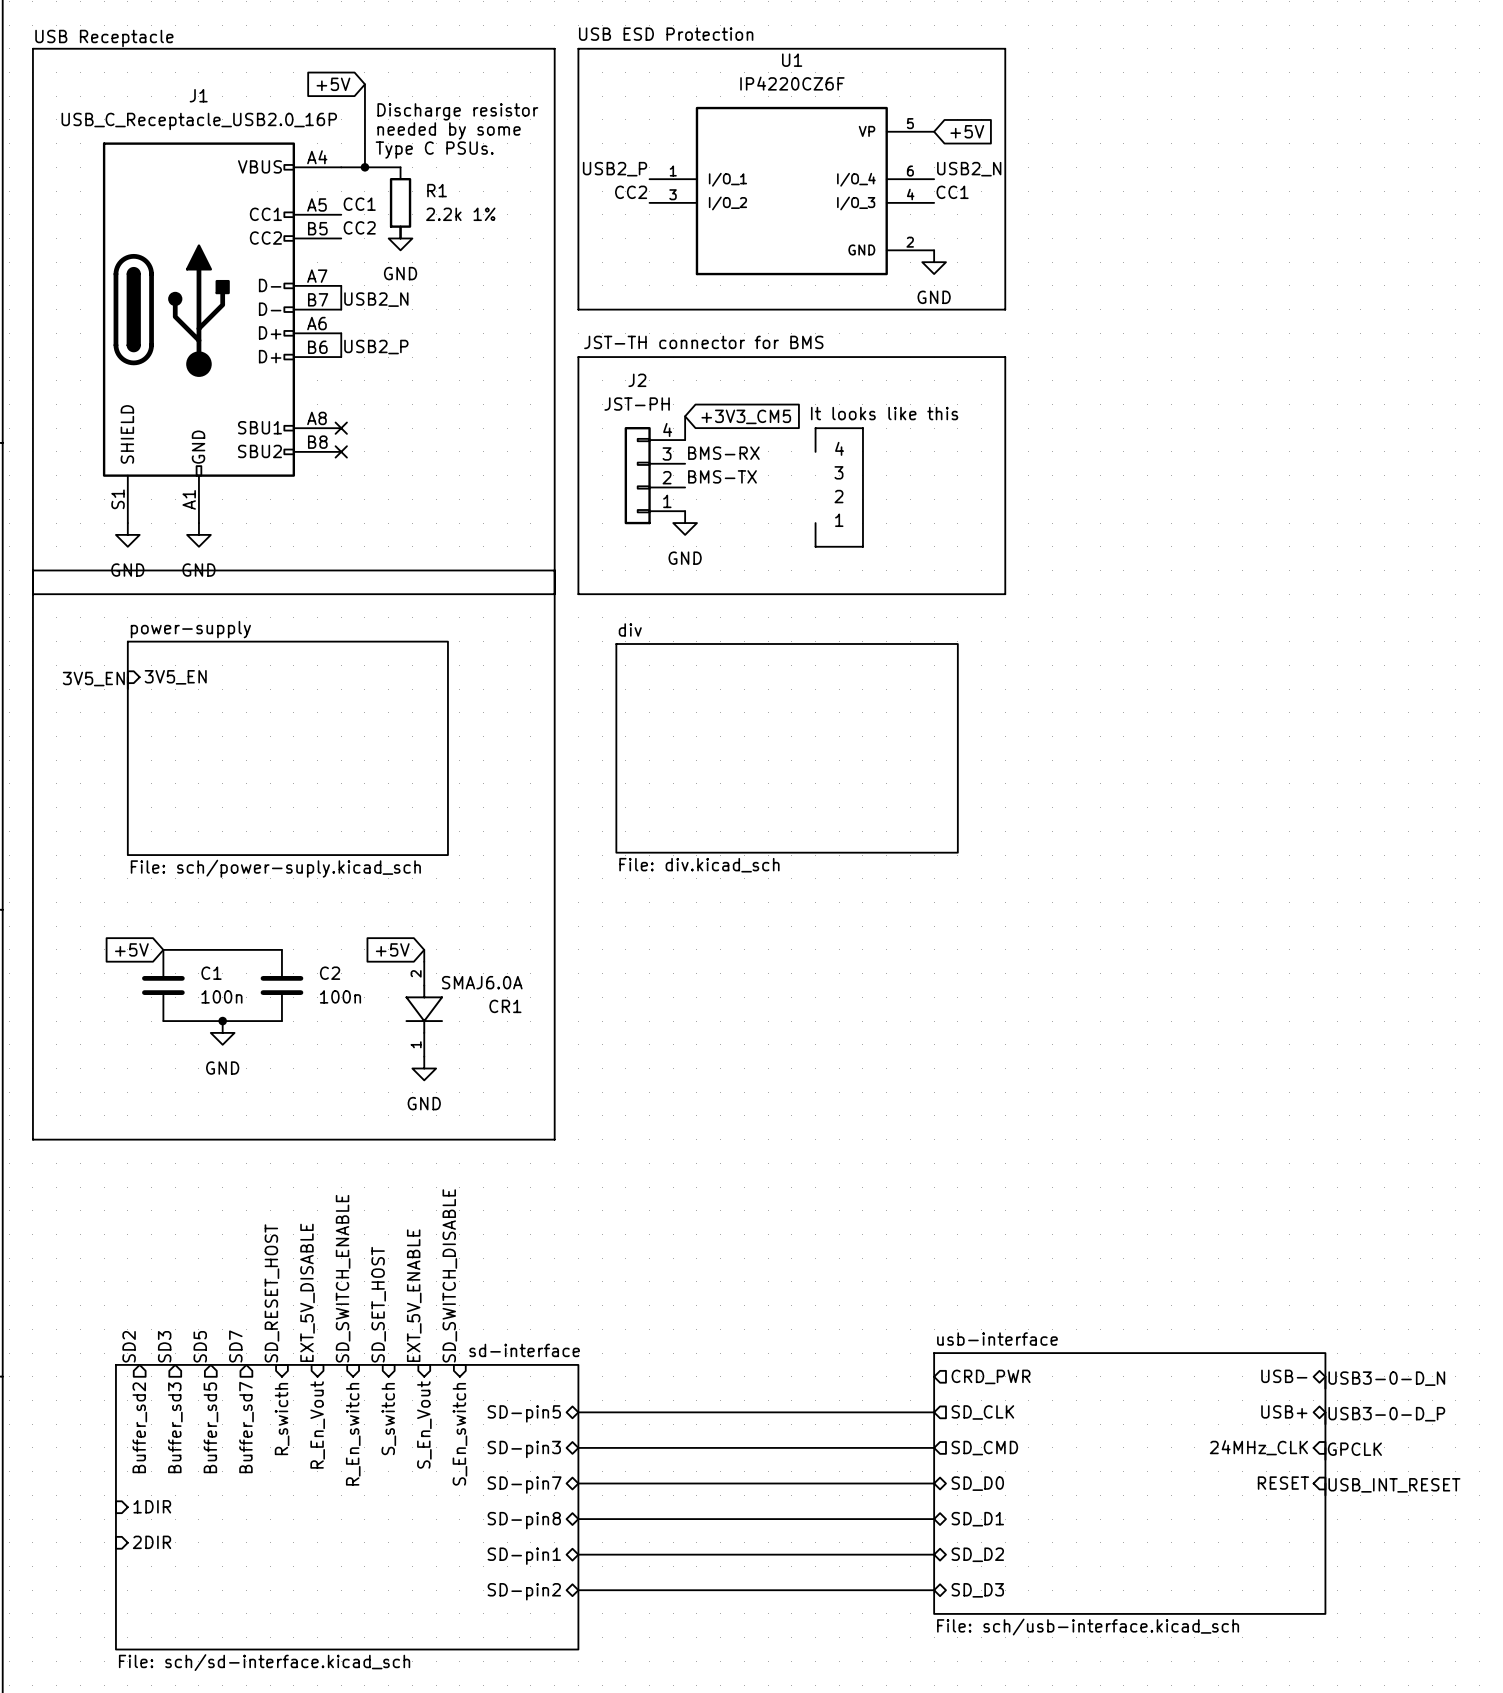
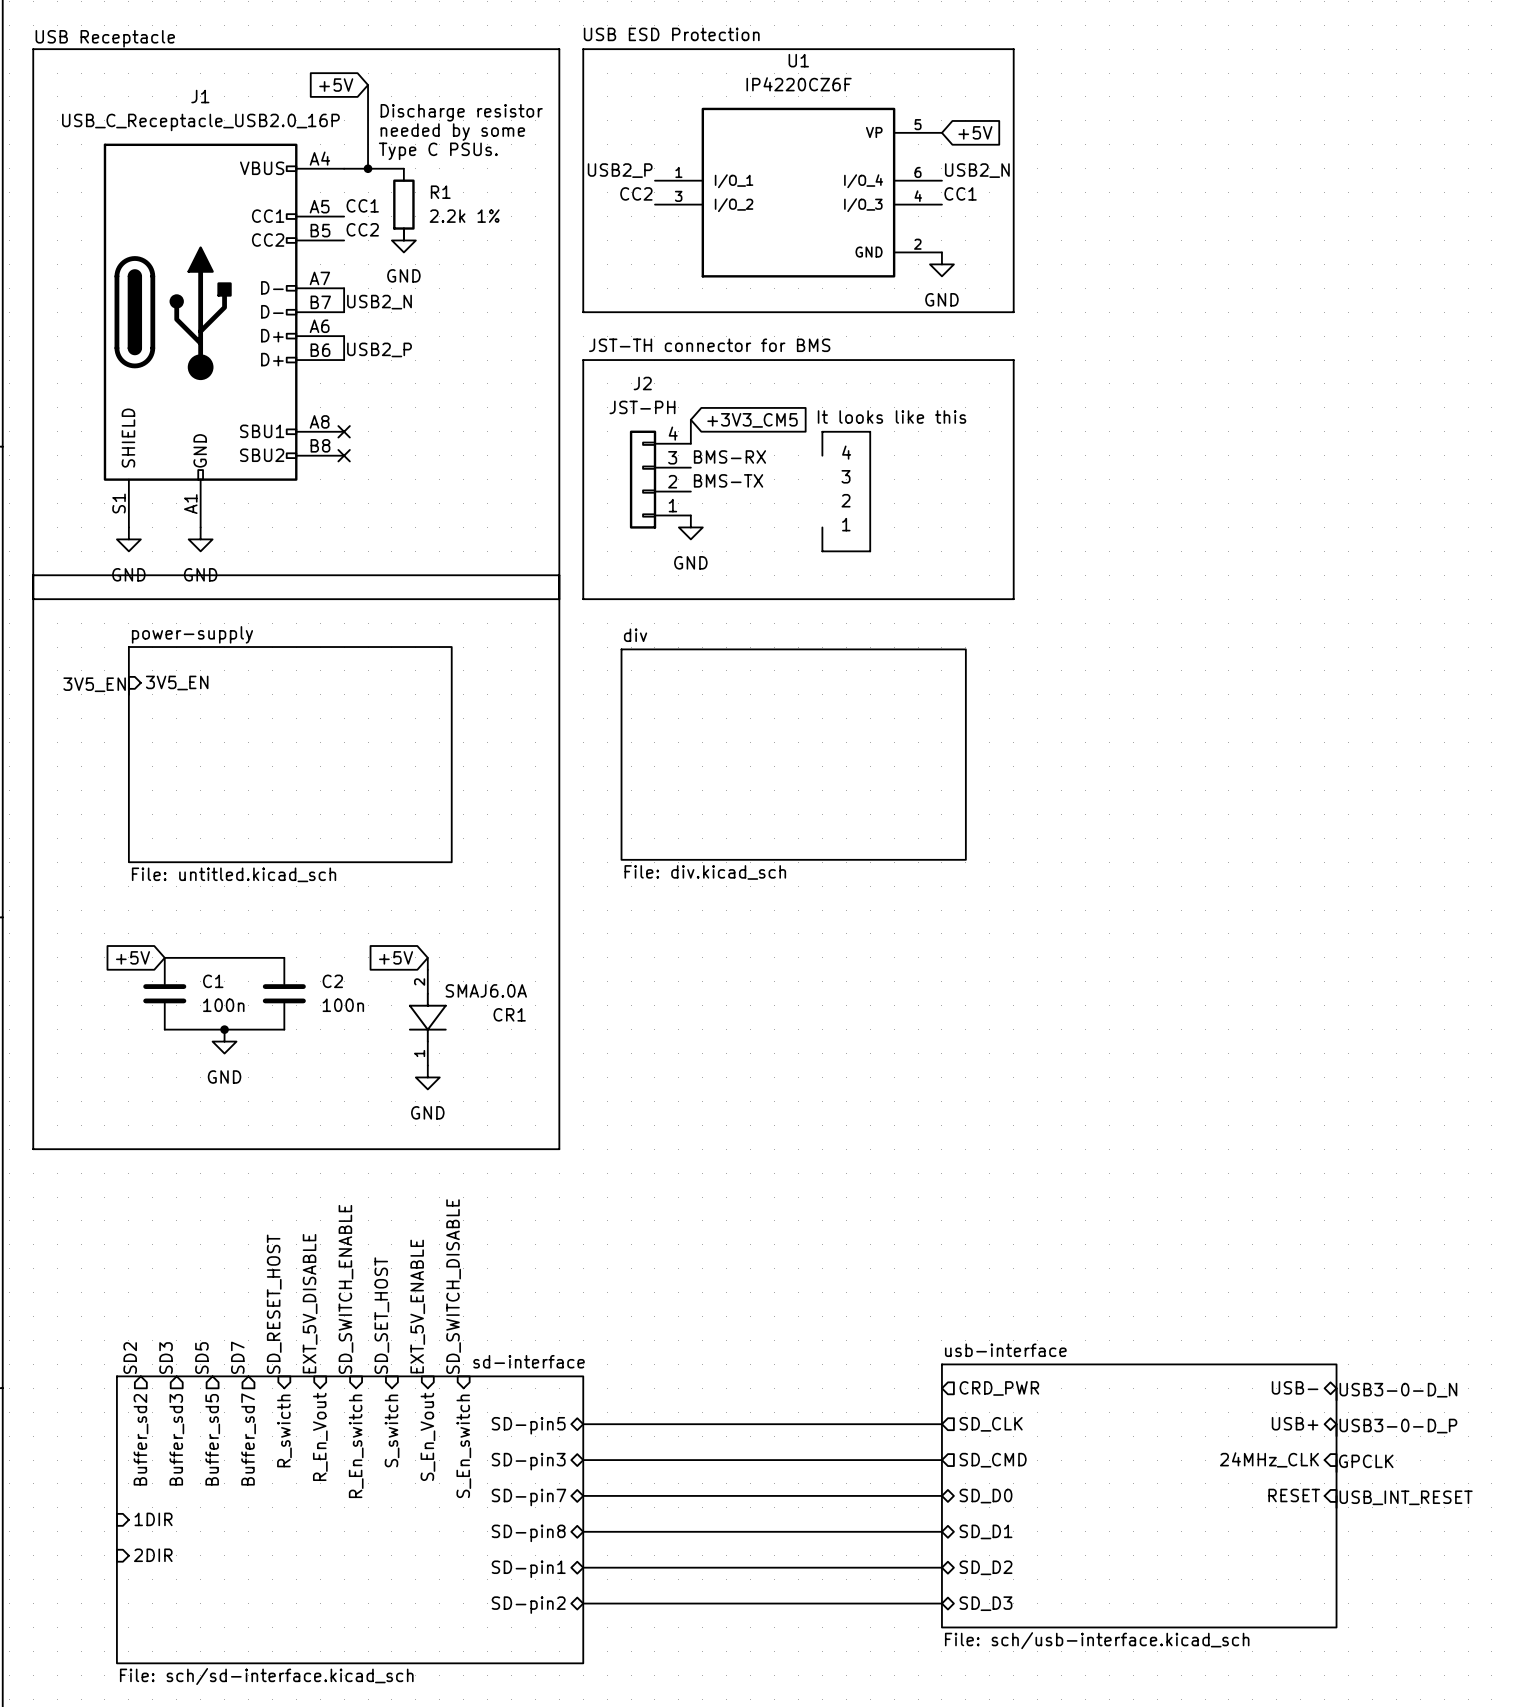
sheet power-supply value: File: sch/power-suply.kicad_sch (275, 868) -> File: untitled.kicad_sch (234, 874)

